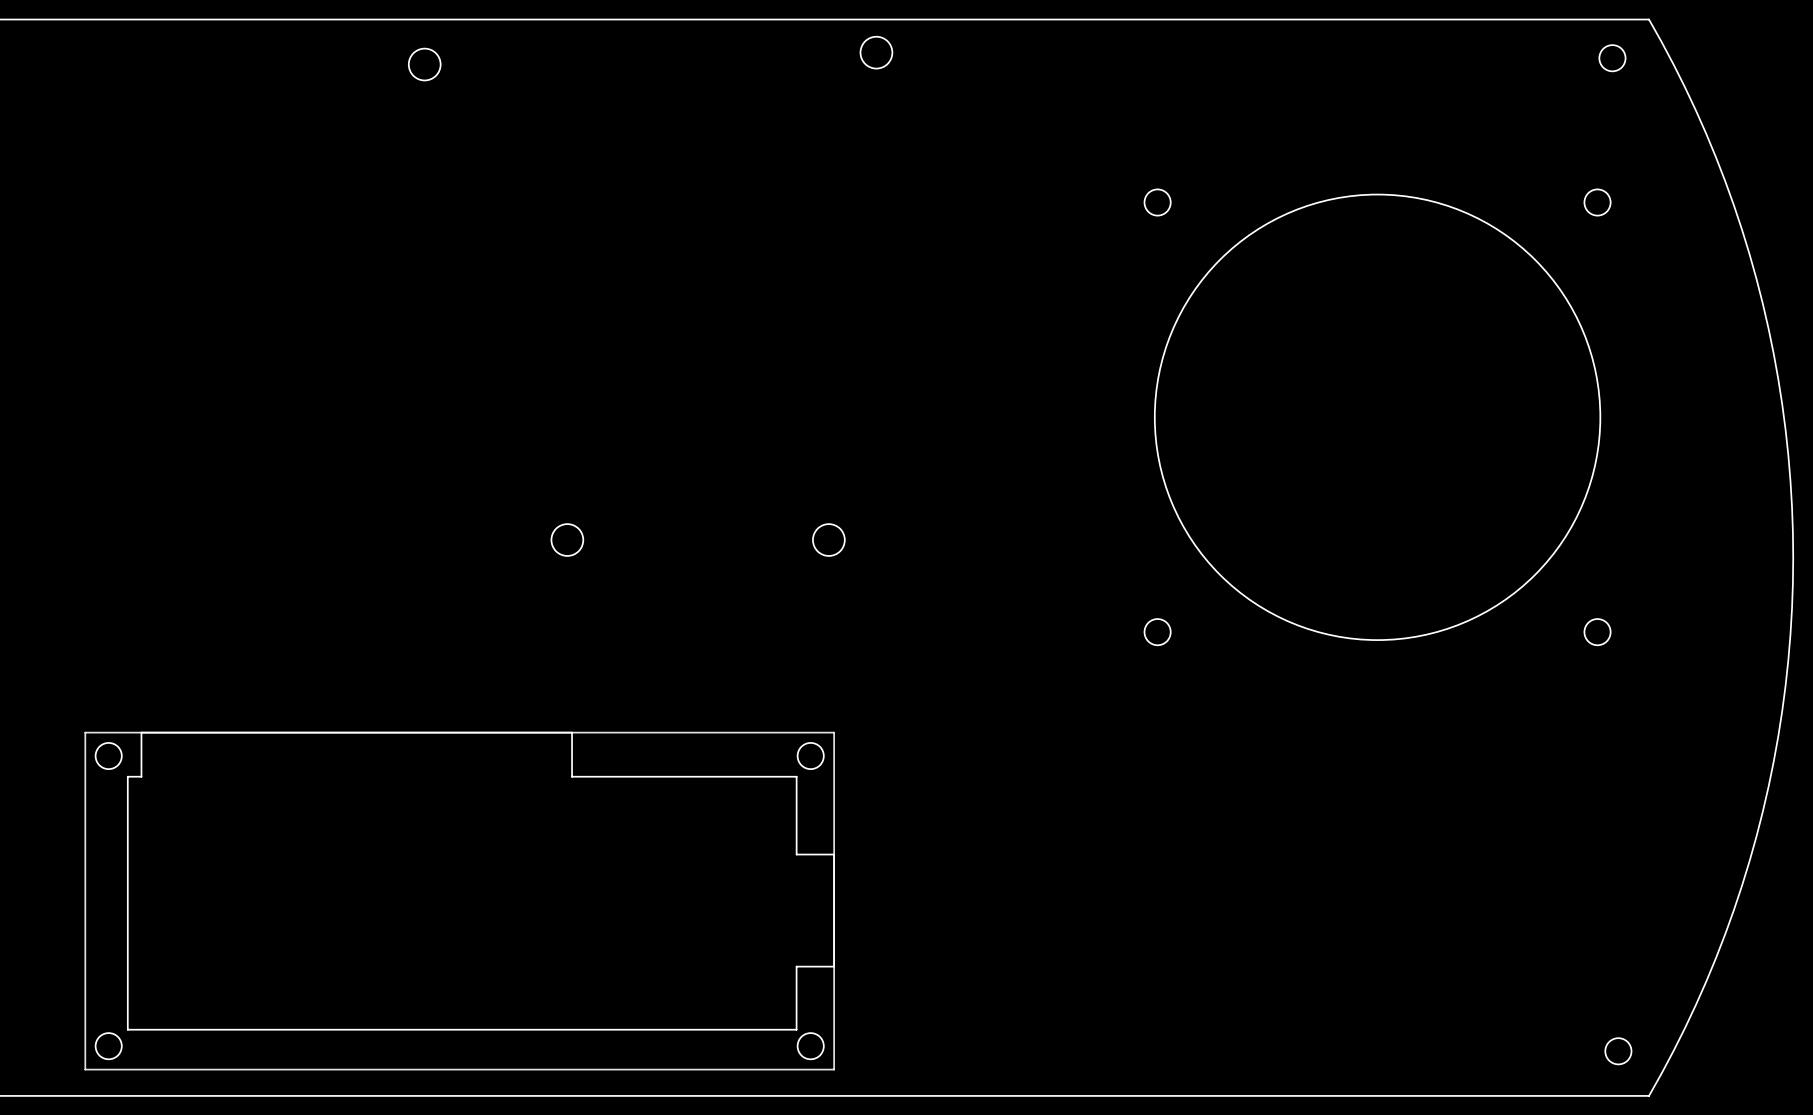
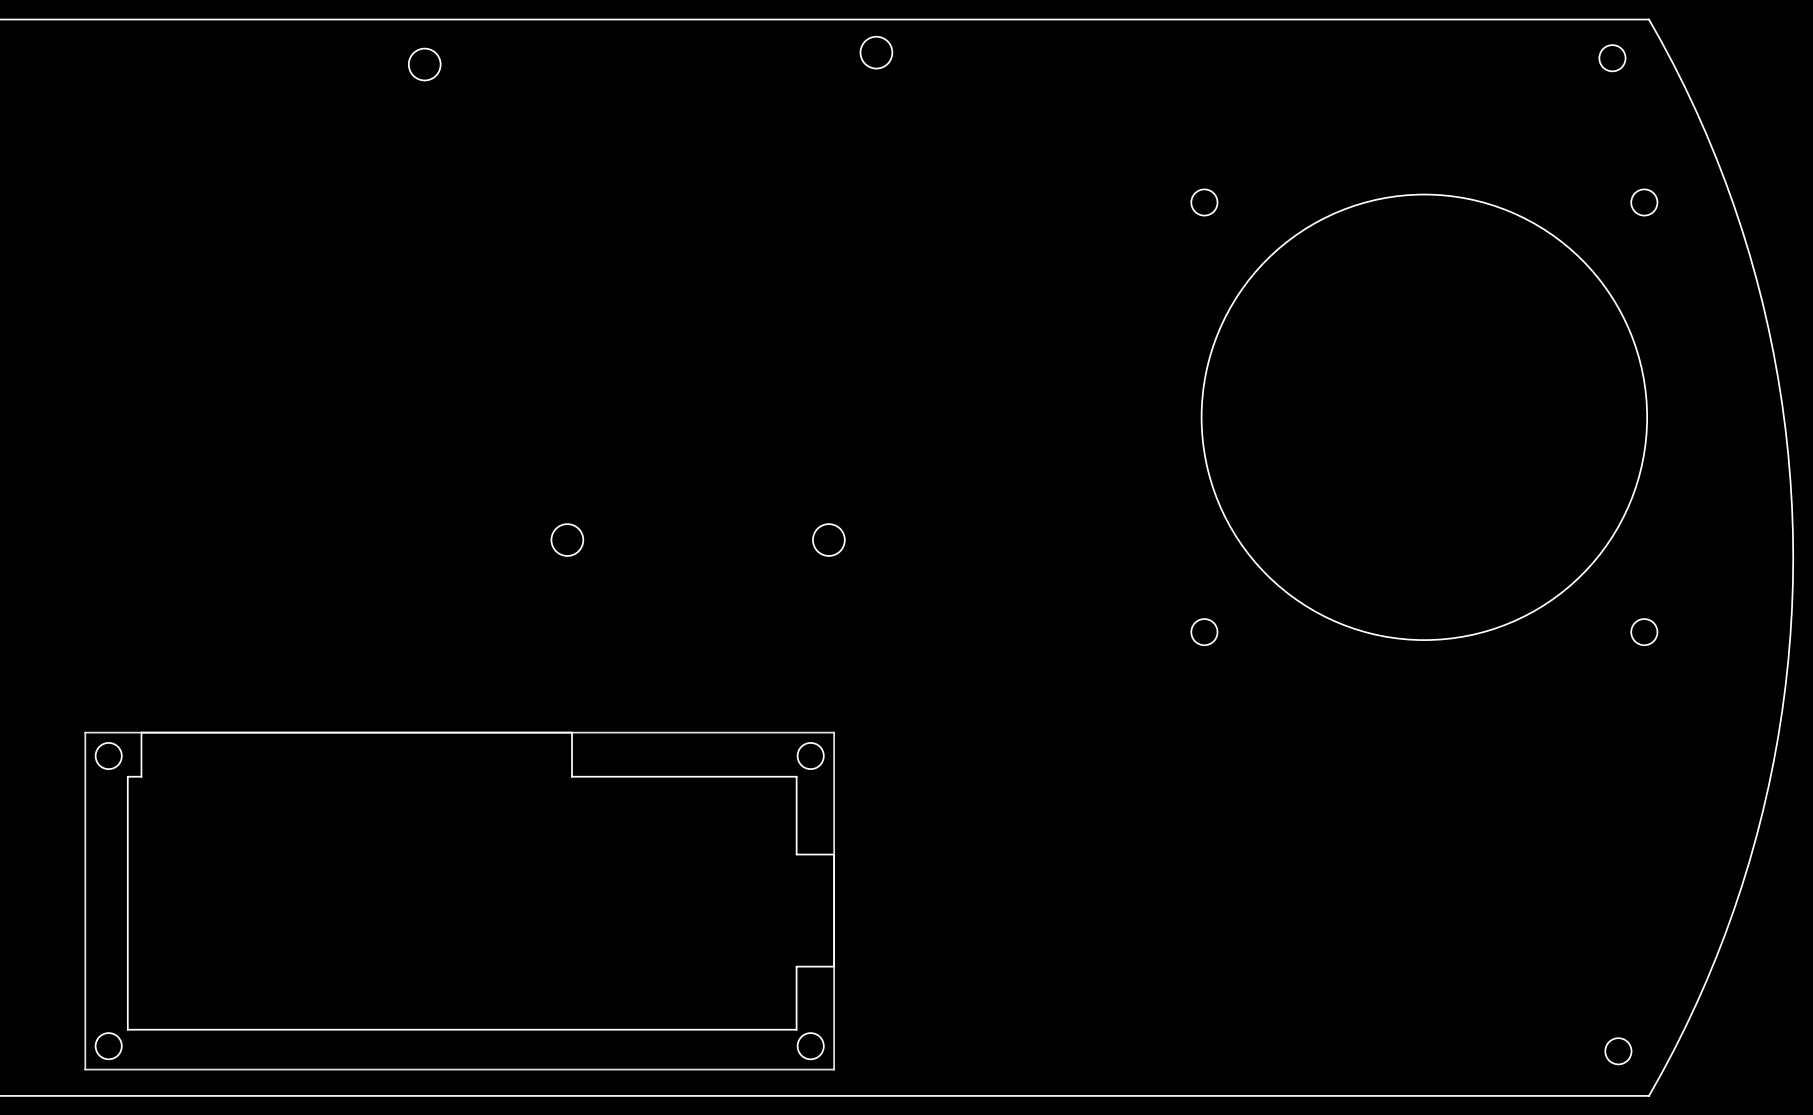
part position: (1377, 417) -> (1424, 417)

